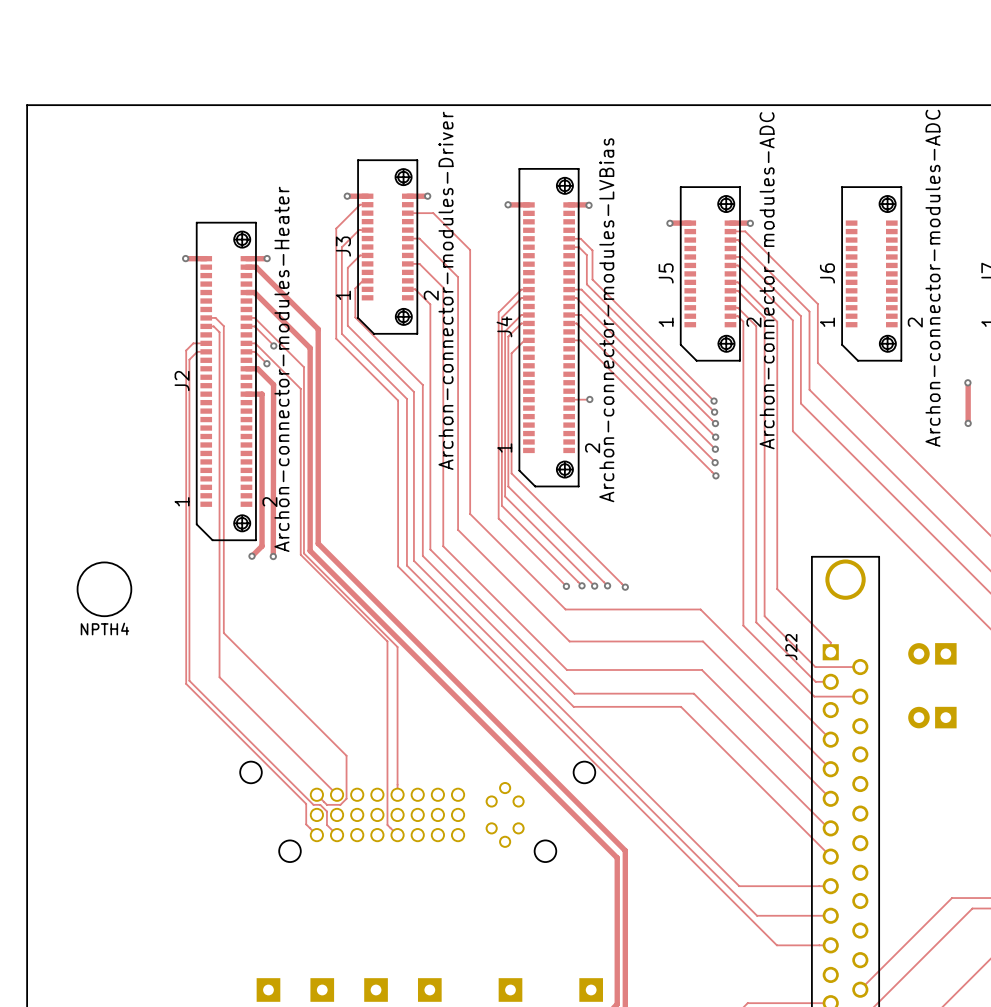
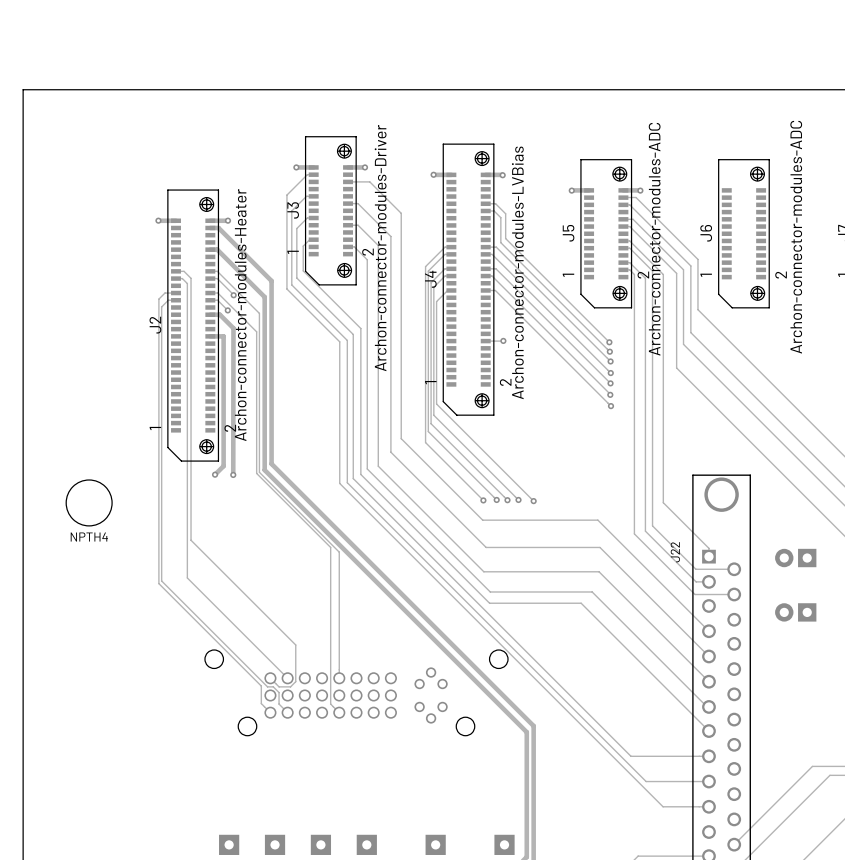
track: (967, 382) (968, 423) -> none
via: (967, 382) -> none
via: (968, 423) -> none

